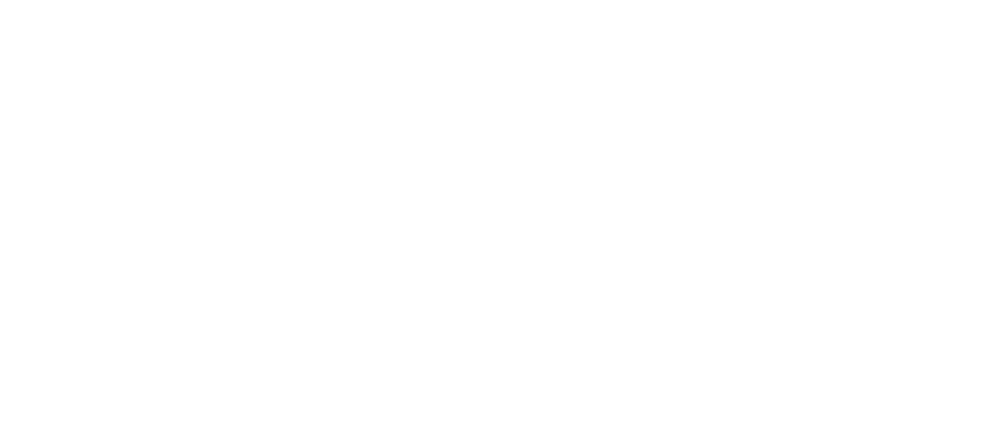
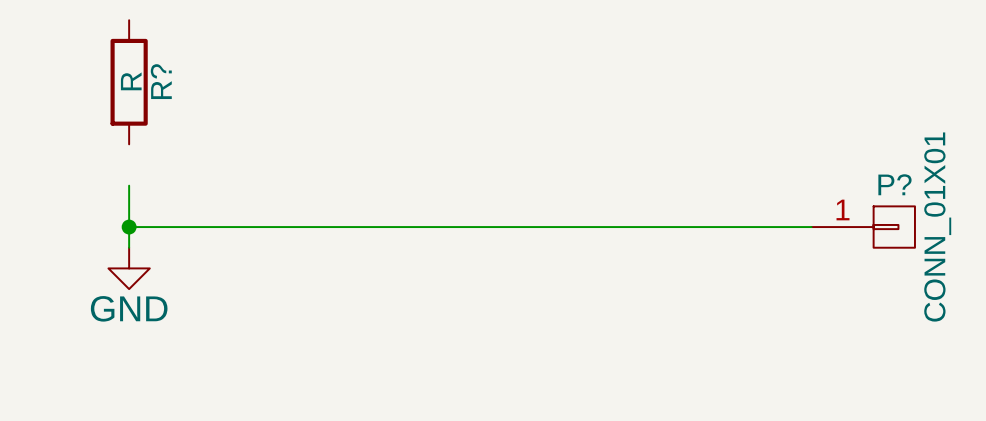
R?: none -> R (129, 82)
wire: none -> (129, 185) (129, 247)
wire: none -> (129, 227) (811, 227)
junction: none -> (129, 227)
P?: none -> CONN_01X01 (863, 227)
power symbol: none -> GND (129, 268)

